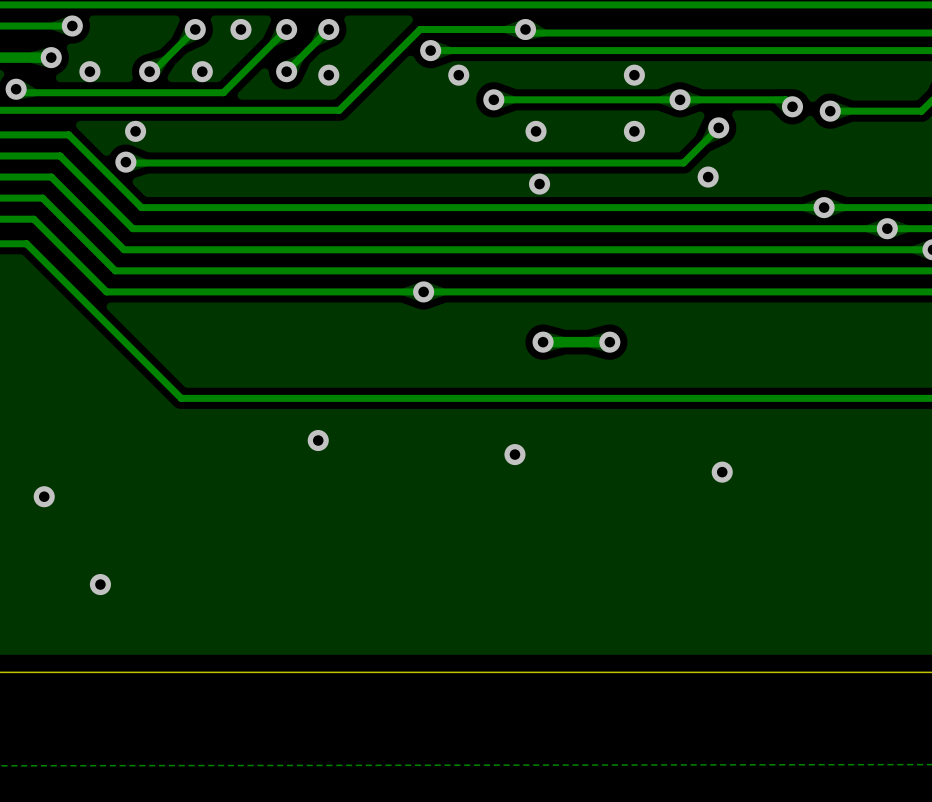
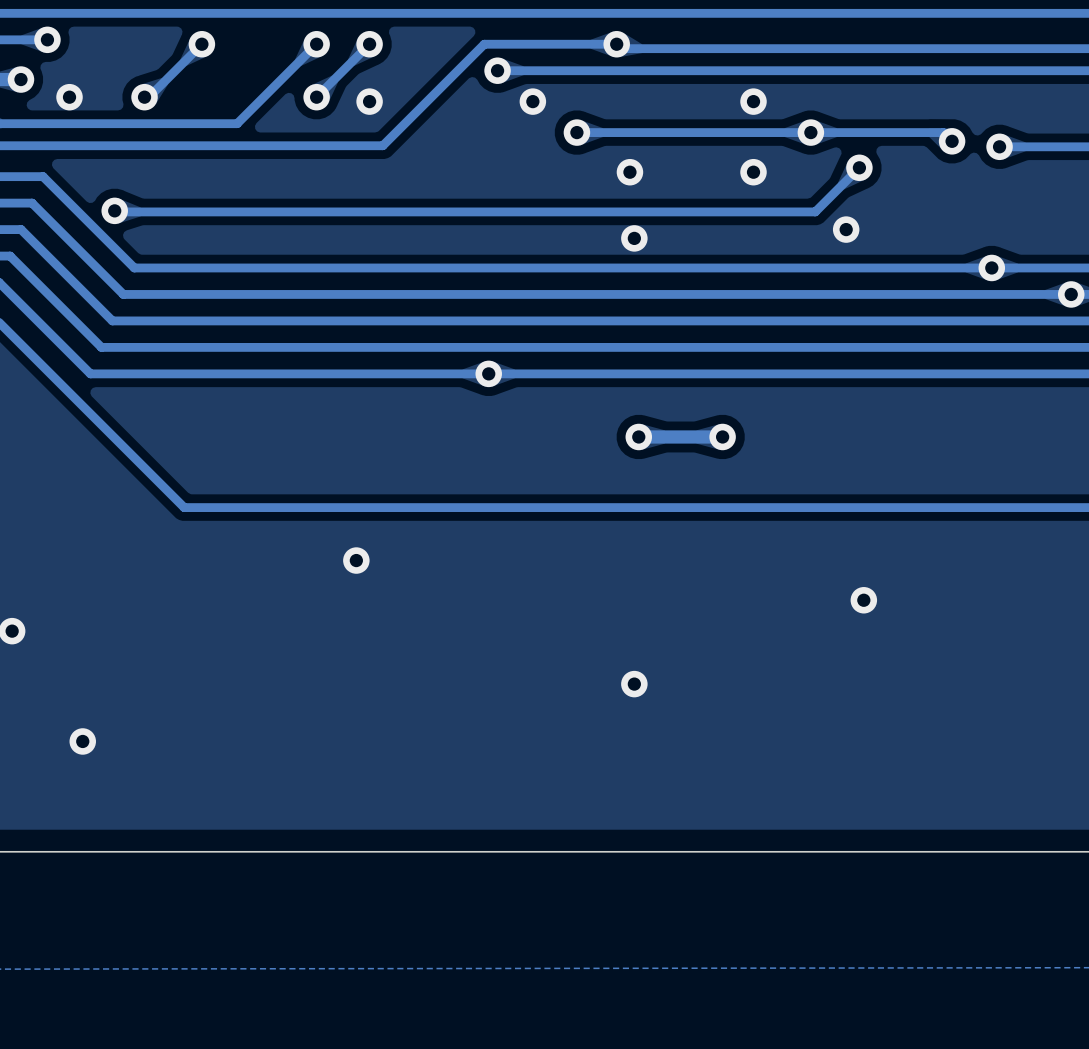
via: (240, 29) -> none
via: (202, 71) -> none
via: (135, 131) -> none
via position: (514, 454) -> (634, 684)

